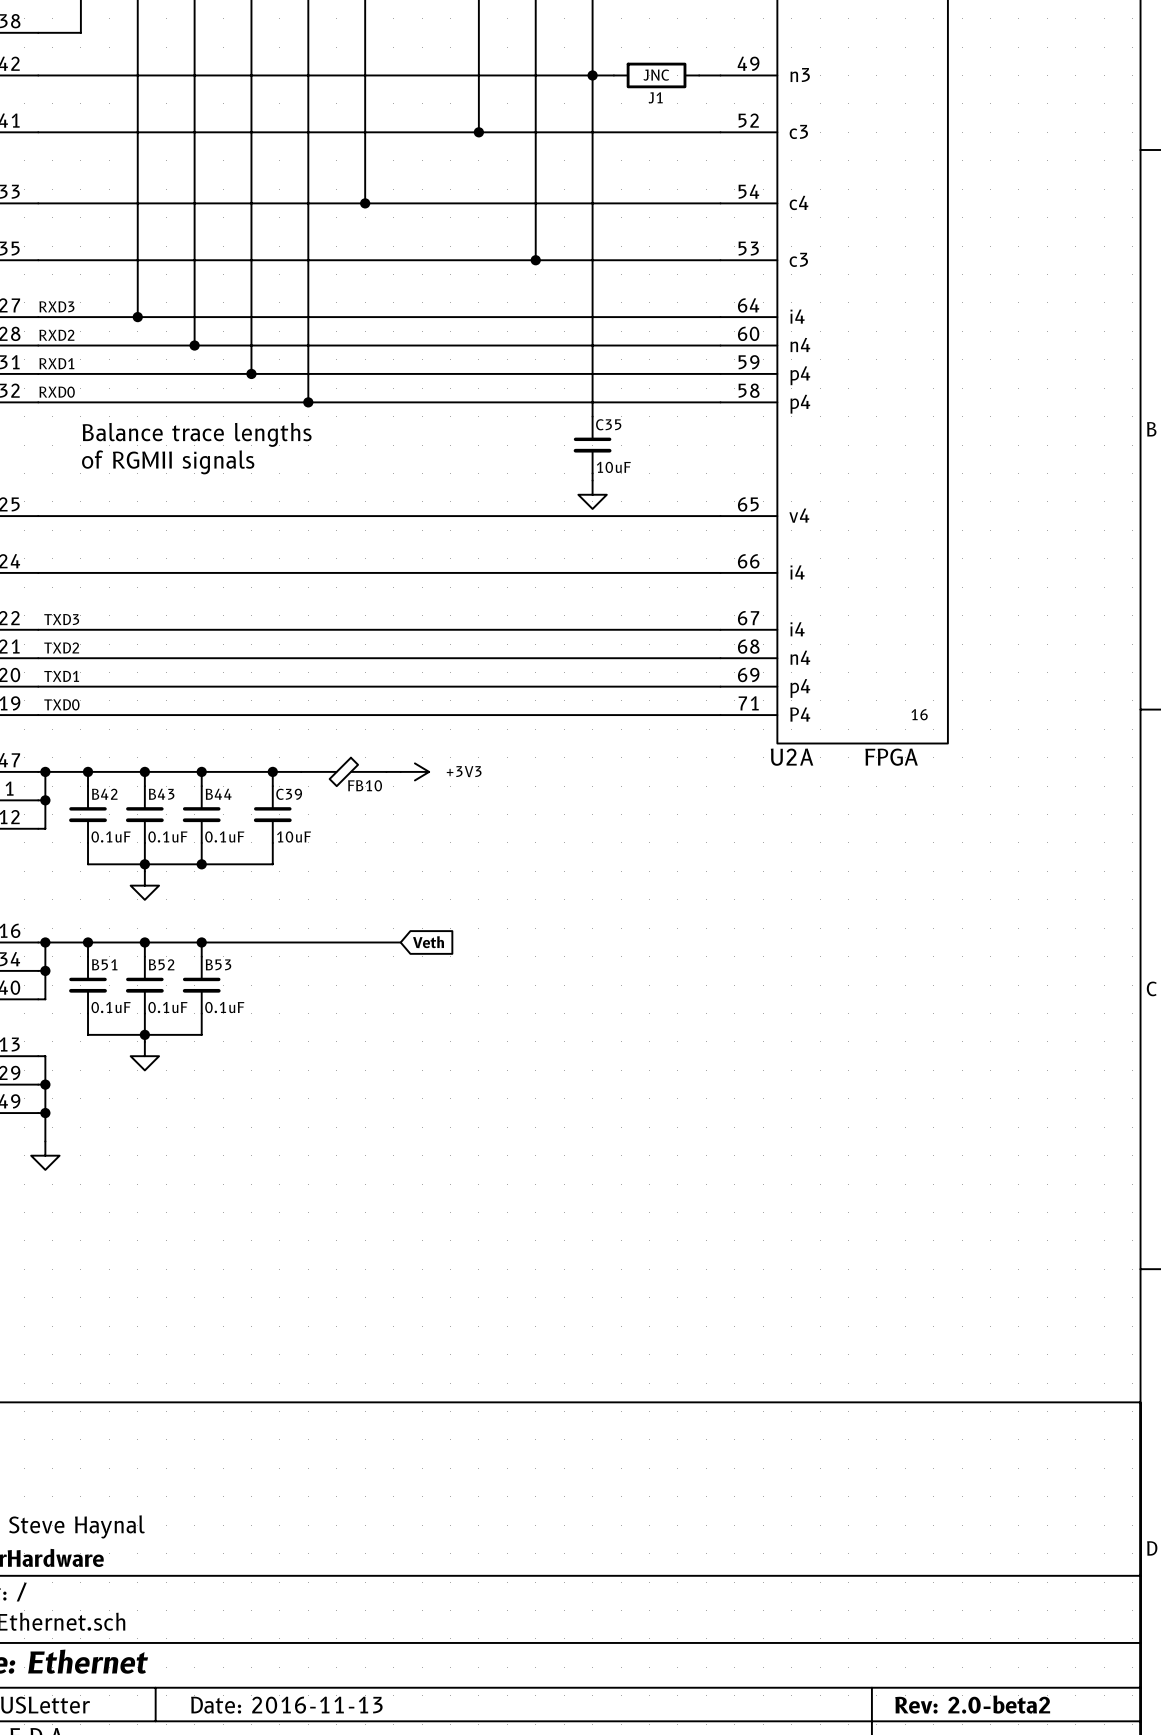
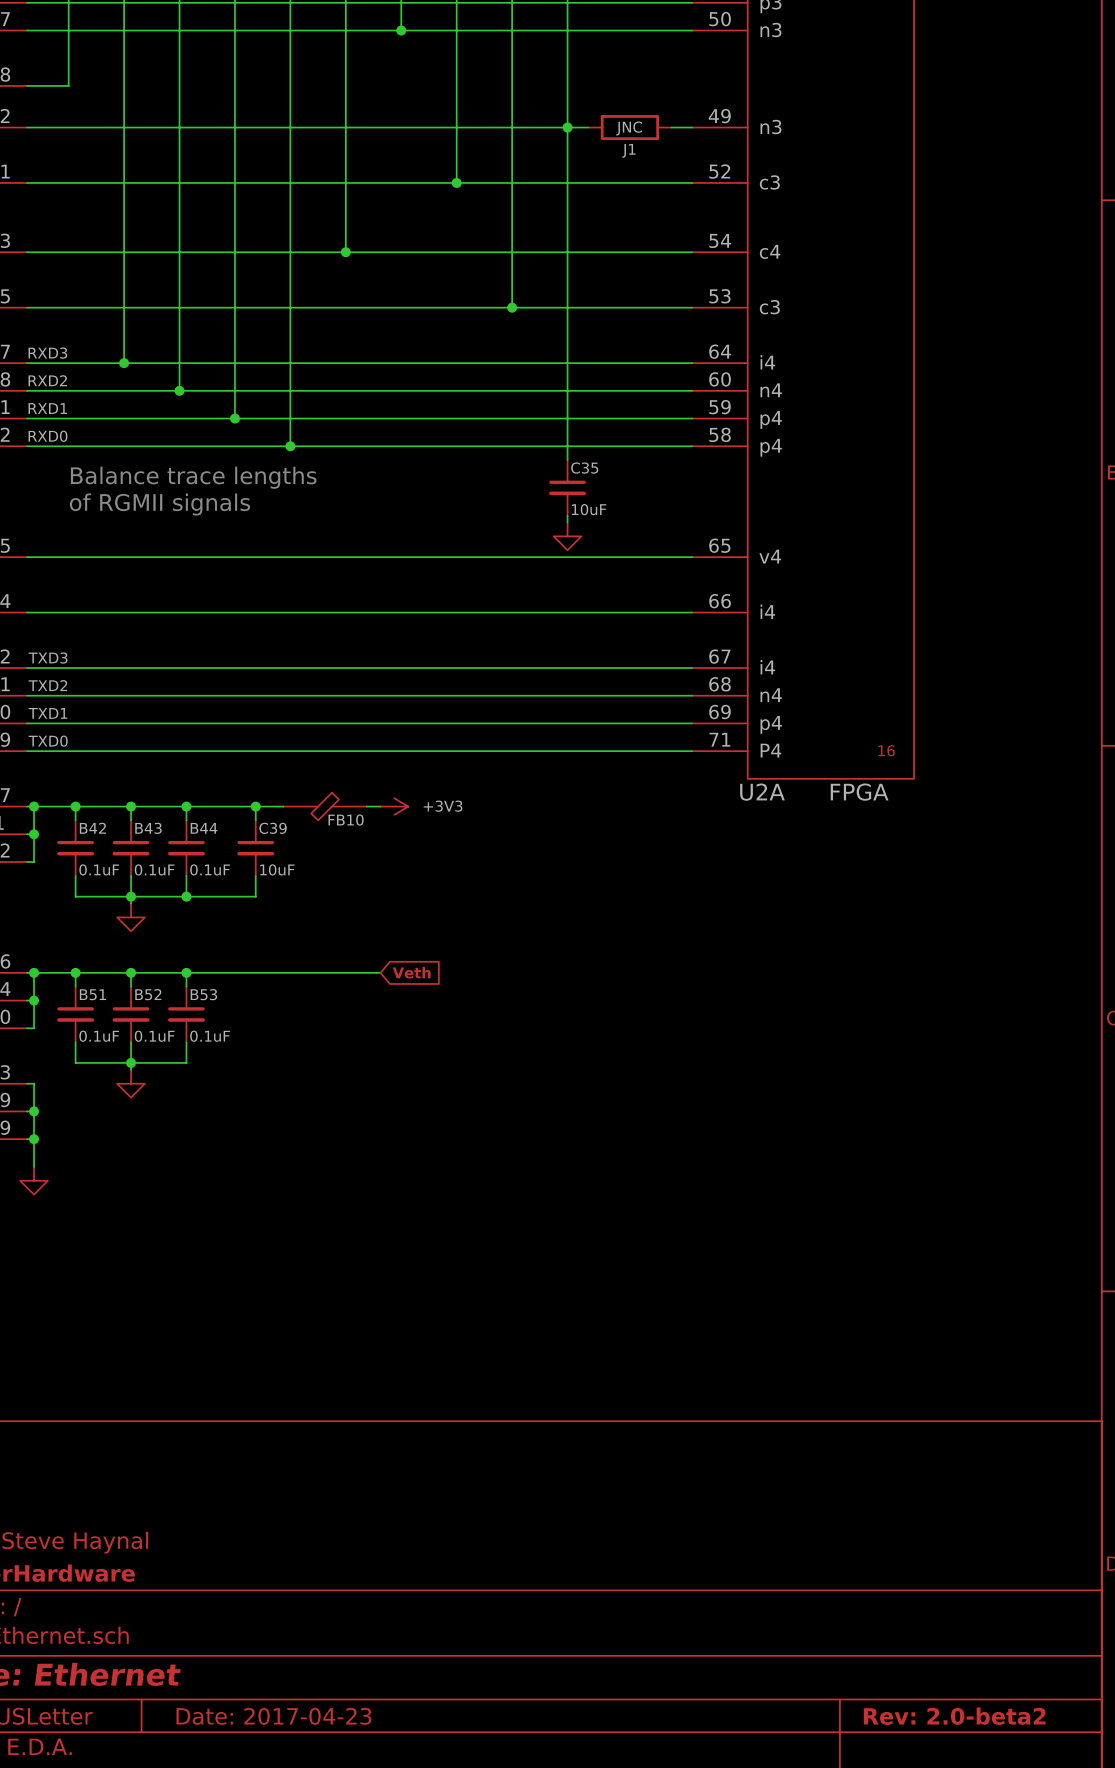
title block: Date: 2016-11-13 (286, 1705) -> Date: 2017-04-23 (273, 1716)

